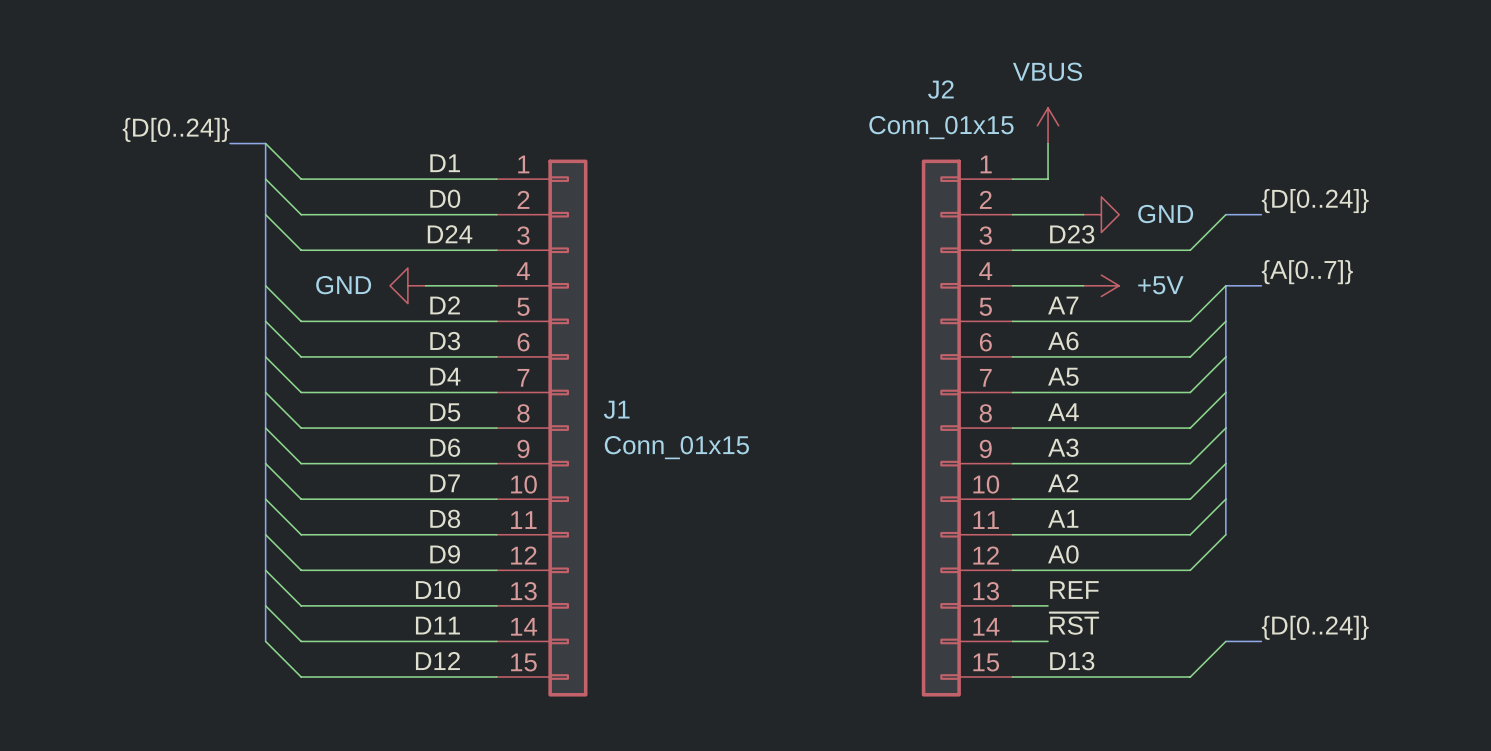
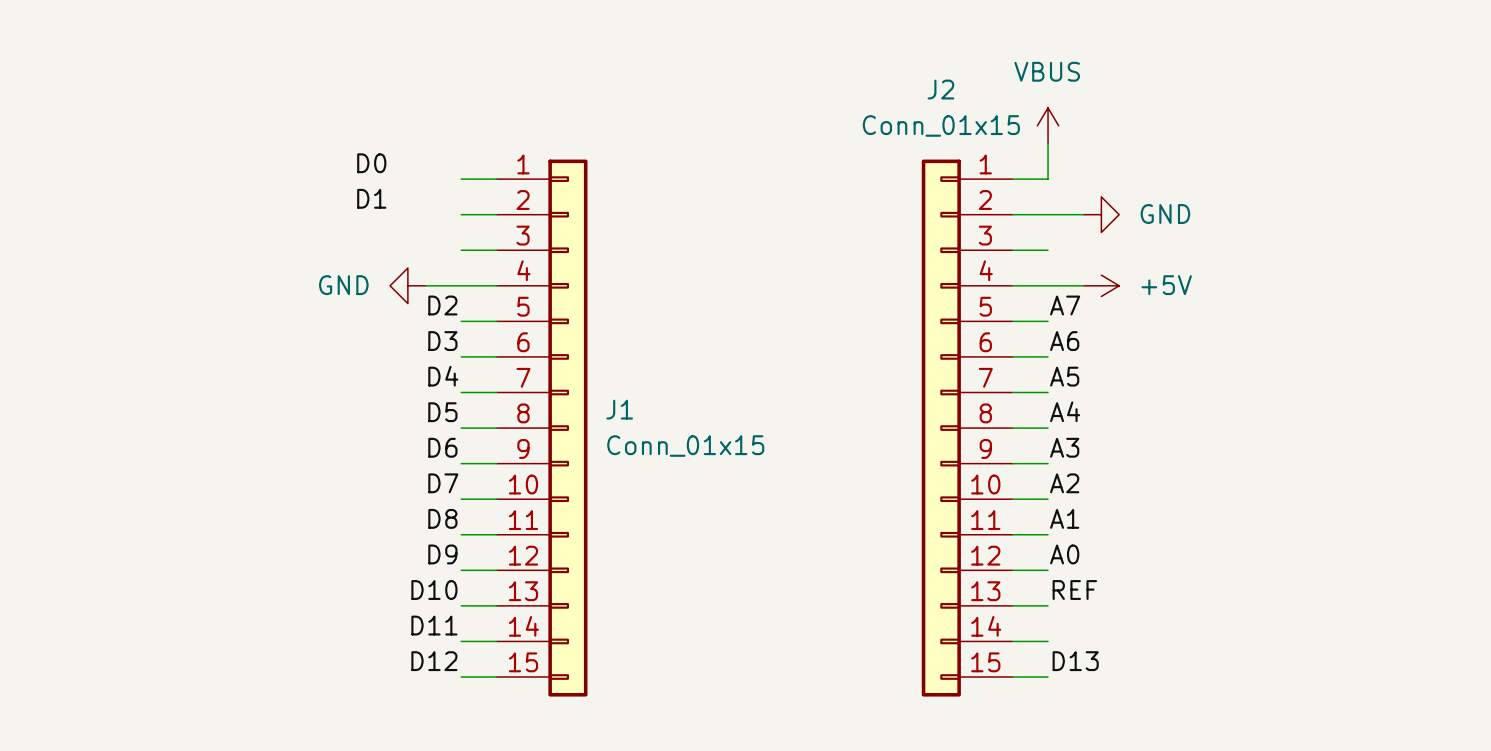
label: {D[0..24]} (176, 129) -> none
bus: (230, 143) (265, 143) (265, 641) -> none
wire: (265, 143) (301, 179) (461, 179) -> none
label position: D1 (445, 163) -> D1 (371, 198)
wire: (265, 179) (301, 214) (461, 214) -> none
label position: D0 (445, 198) -> D0 (371, 163)
label: {D[0..24]} (1315, 201) -> none
wire: (265, 214) (301, 250) (461, 250) -> none
wire: (1225, 214) (1190, 250) (1048, 250) -> none
bus: (1225, 214) (1261, 214) -> none
label: D24 (450, 234) -> none
label: D23 (1072, 234) -> none
label: {A[0..7]} (1307, 272) -> none
wire: (265, 285) (301, 321) (461, 321) -> none
wire: (1225, 285) (1190, 321) (1048, 321) -> none
bus: (1261, 285) (1225, 285) (1225, 534) -> none
wire: (265, 321) (301, 356) (461, 356) -> none
wire: (1225, 321) (1190, 356) (1048, 356) -> none
wire: (265, 356) (301, 392) (461, 392) -> none
wire: (1225, 356) (1190, 392) (1048, 392) -> none
wire: (265, 392) (301, 428) (461, 428) -> none
wire: (1225, 392) (1190, 428) (1048, 428) -> none
wire: (265, 428) (301, 463) (461, 463) -> none
wire: (1225, 428) (1190, 463) (1048, 463) -> none
wire: (265, 463) (301, 499) (461, 499) -> none
wire: (1225, 463) (1190, 499) (1048, 499) -> none
wire: (265, 499) (301, 534) (461, 534) -> none
wire: (1225, 499) (1190, 534) (1048, 534) -> none
wire: (265, 534) (301, 570) (461, 570) -> none
wire: (1225, 534) (1190, 570) (1048, 570) -> none
wire: (265, 570) (301, 605) (461, 605) -> none
wire: (265, 605) (301, 641) (461, 641) -> none
label: ~{RST} (1074, 623) -> none
label: {D[0..24]} (1315, 627) -> none
wire: (265, 641) (301, 677) (461, 677) -> none
wire: (1225, 641) (1190, 677) (1048, 677) -> none
bus: (1225, 641) (1261, 641) -> none

